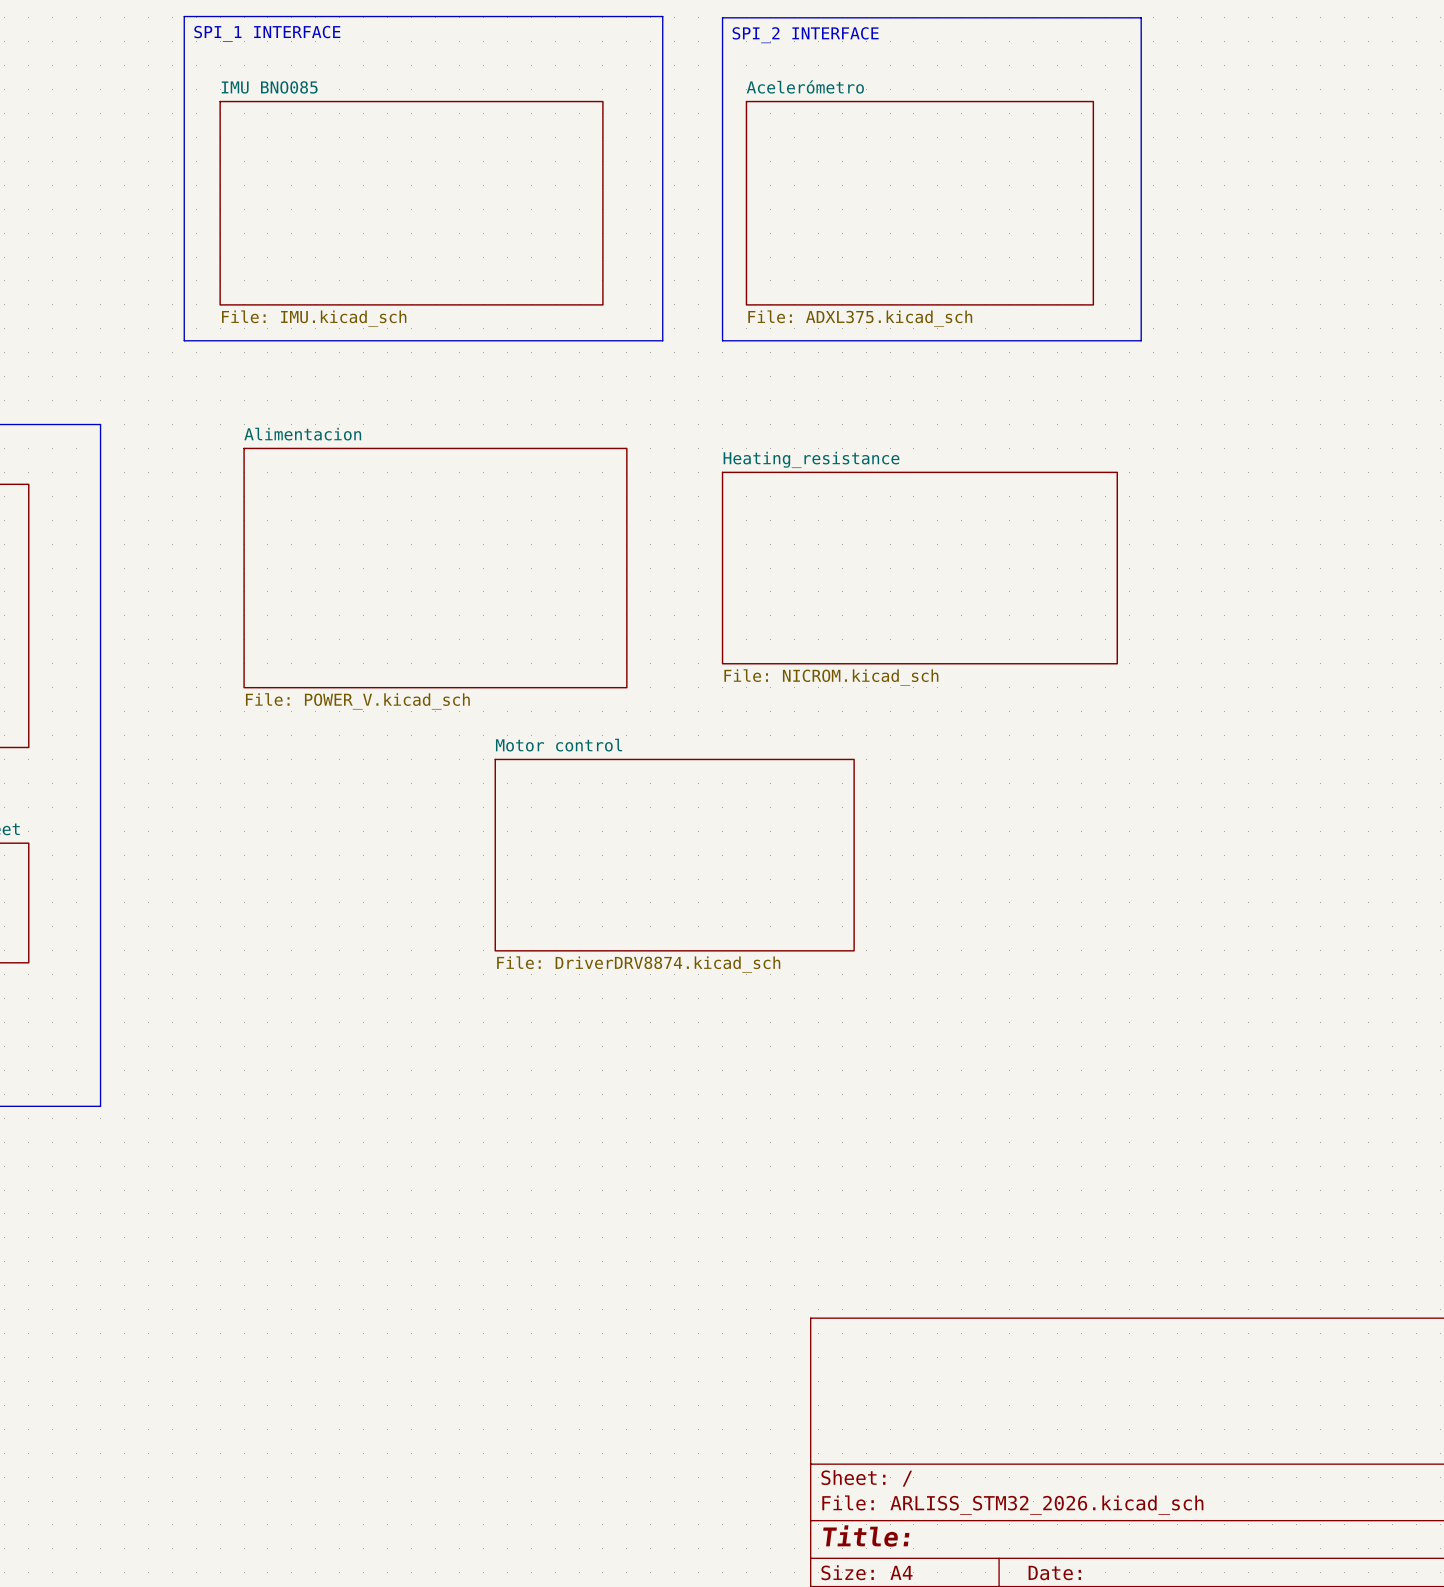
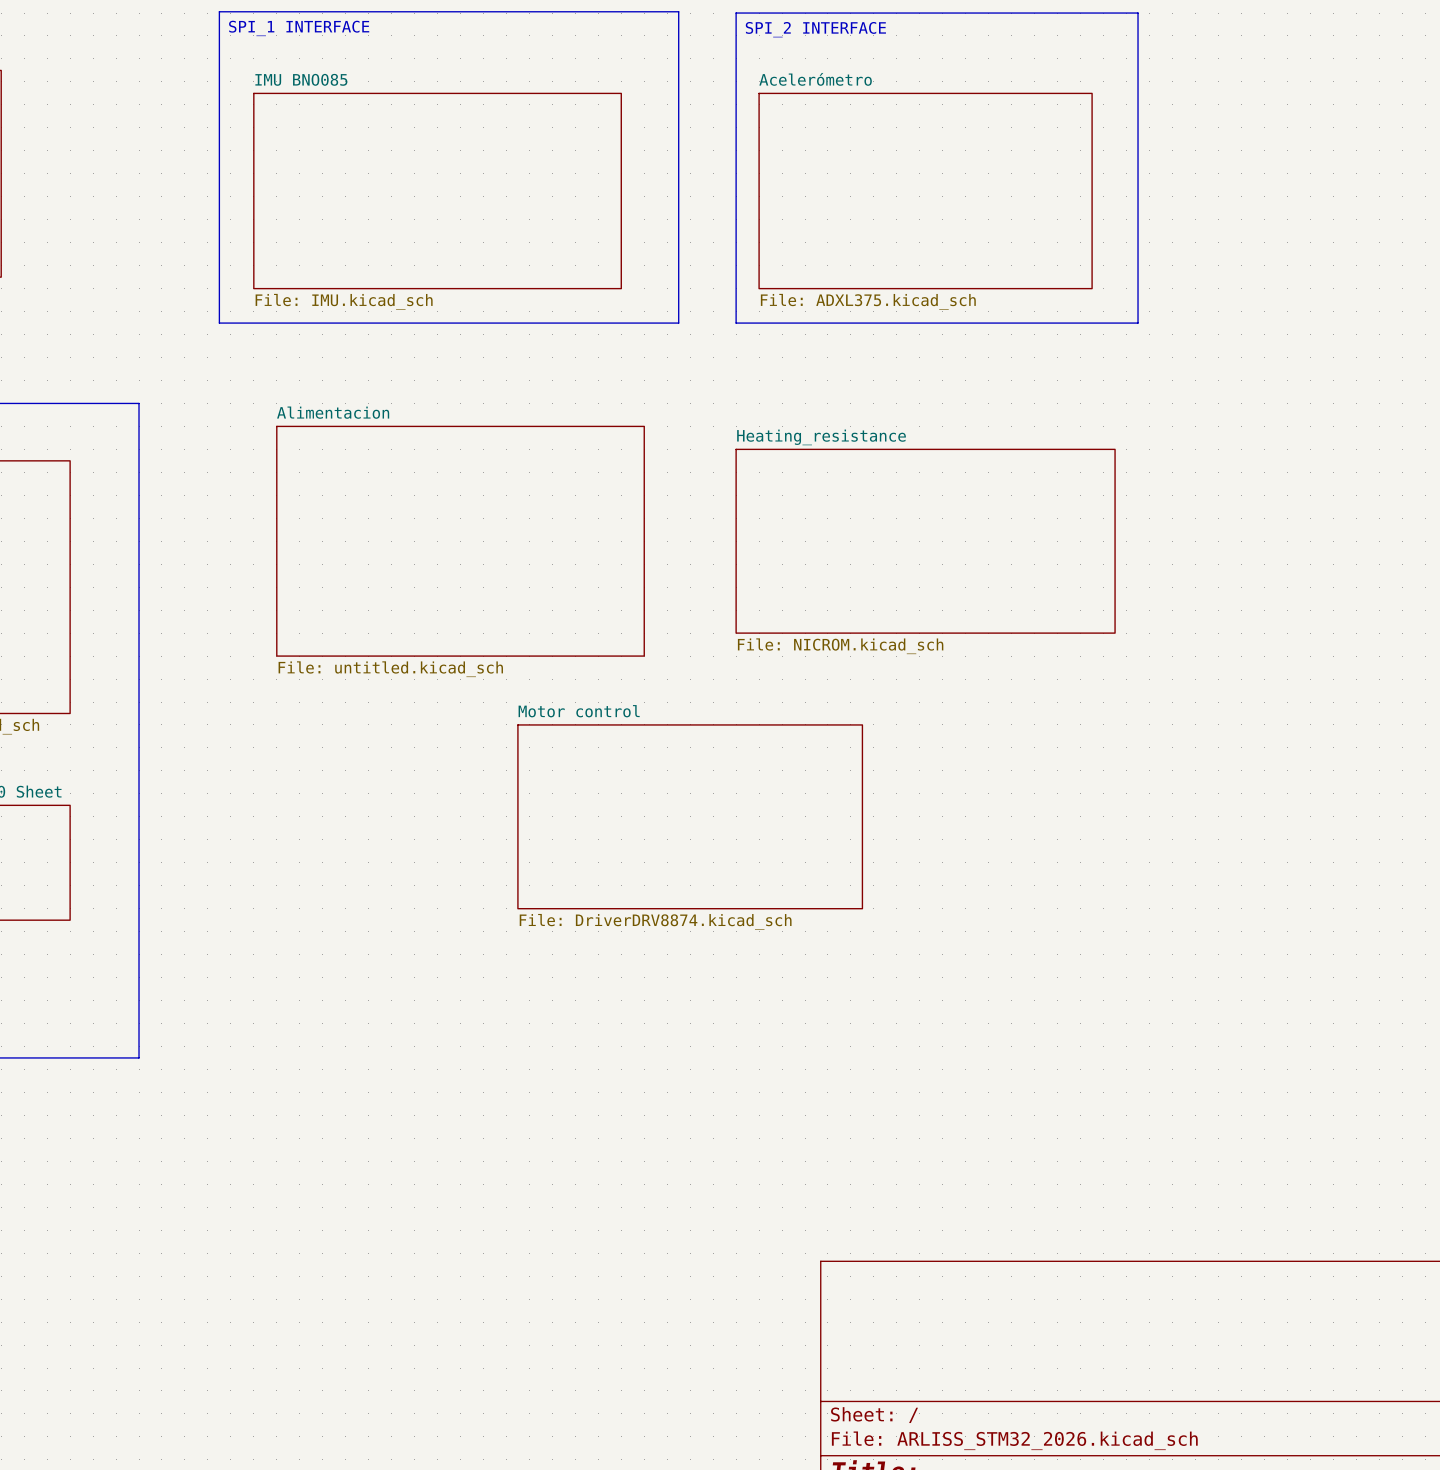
sheet Alimentacion value: File: POWER_V.kicad_sch (357, 701) -> File: untitled.kicad_sch (390, 669)

